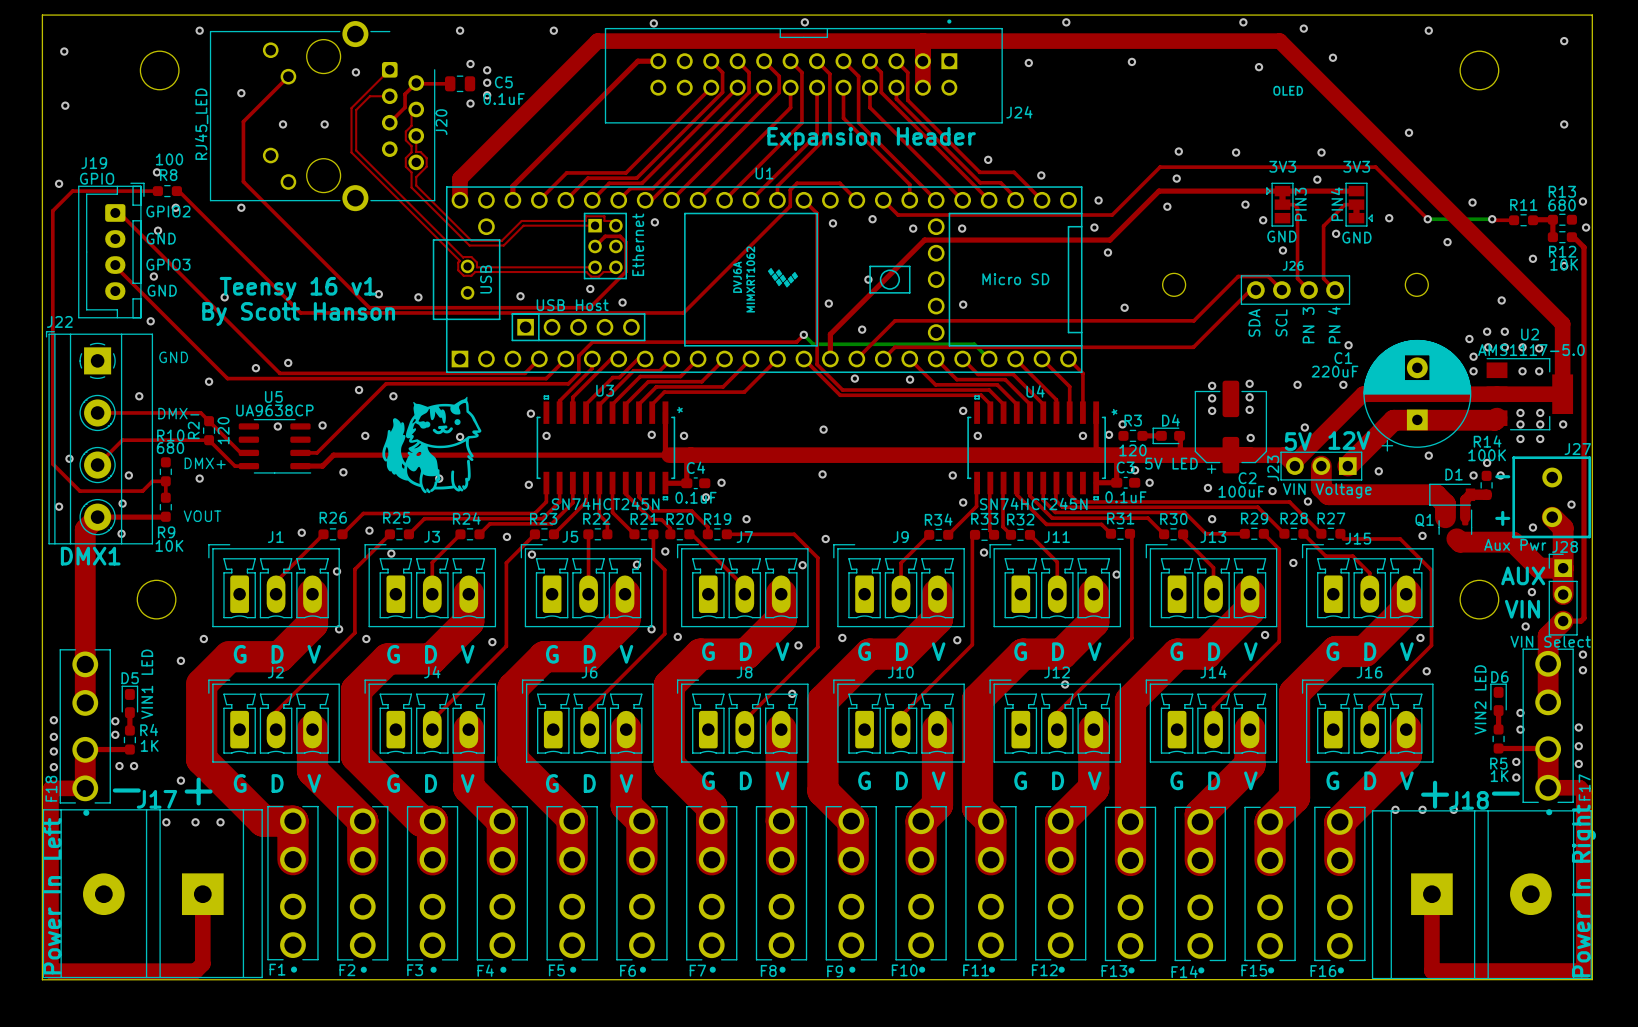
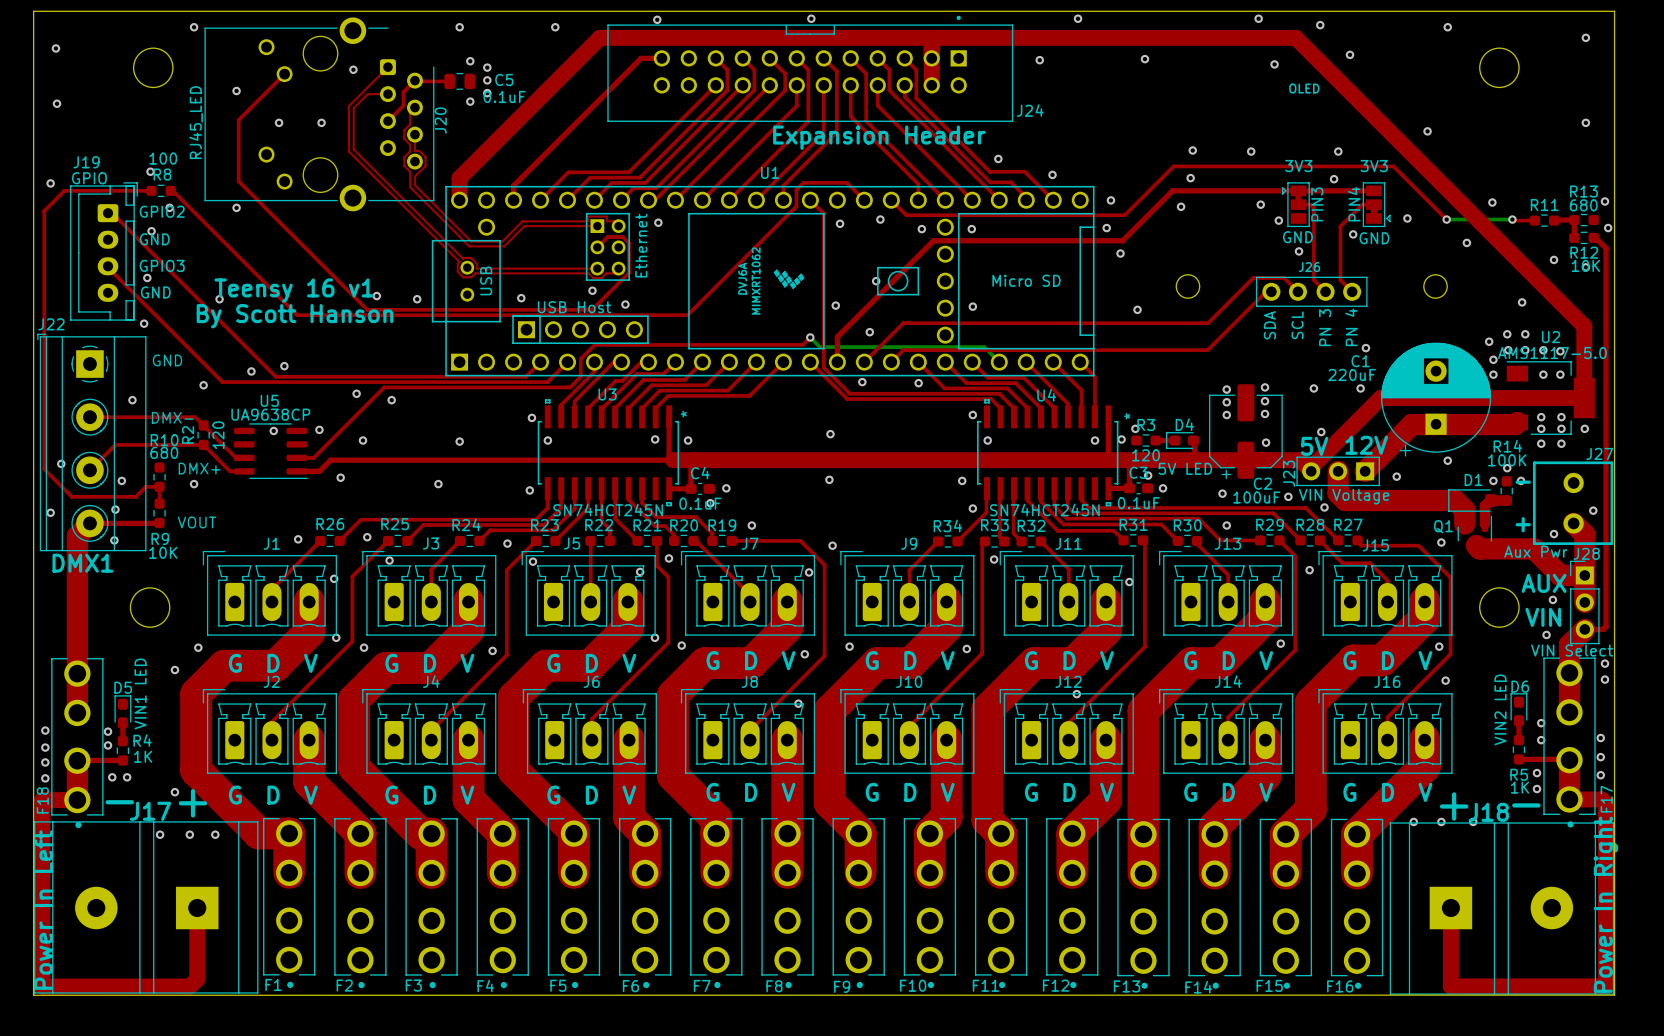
drawing: [382, 396, 482, 494] -> none

